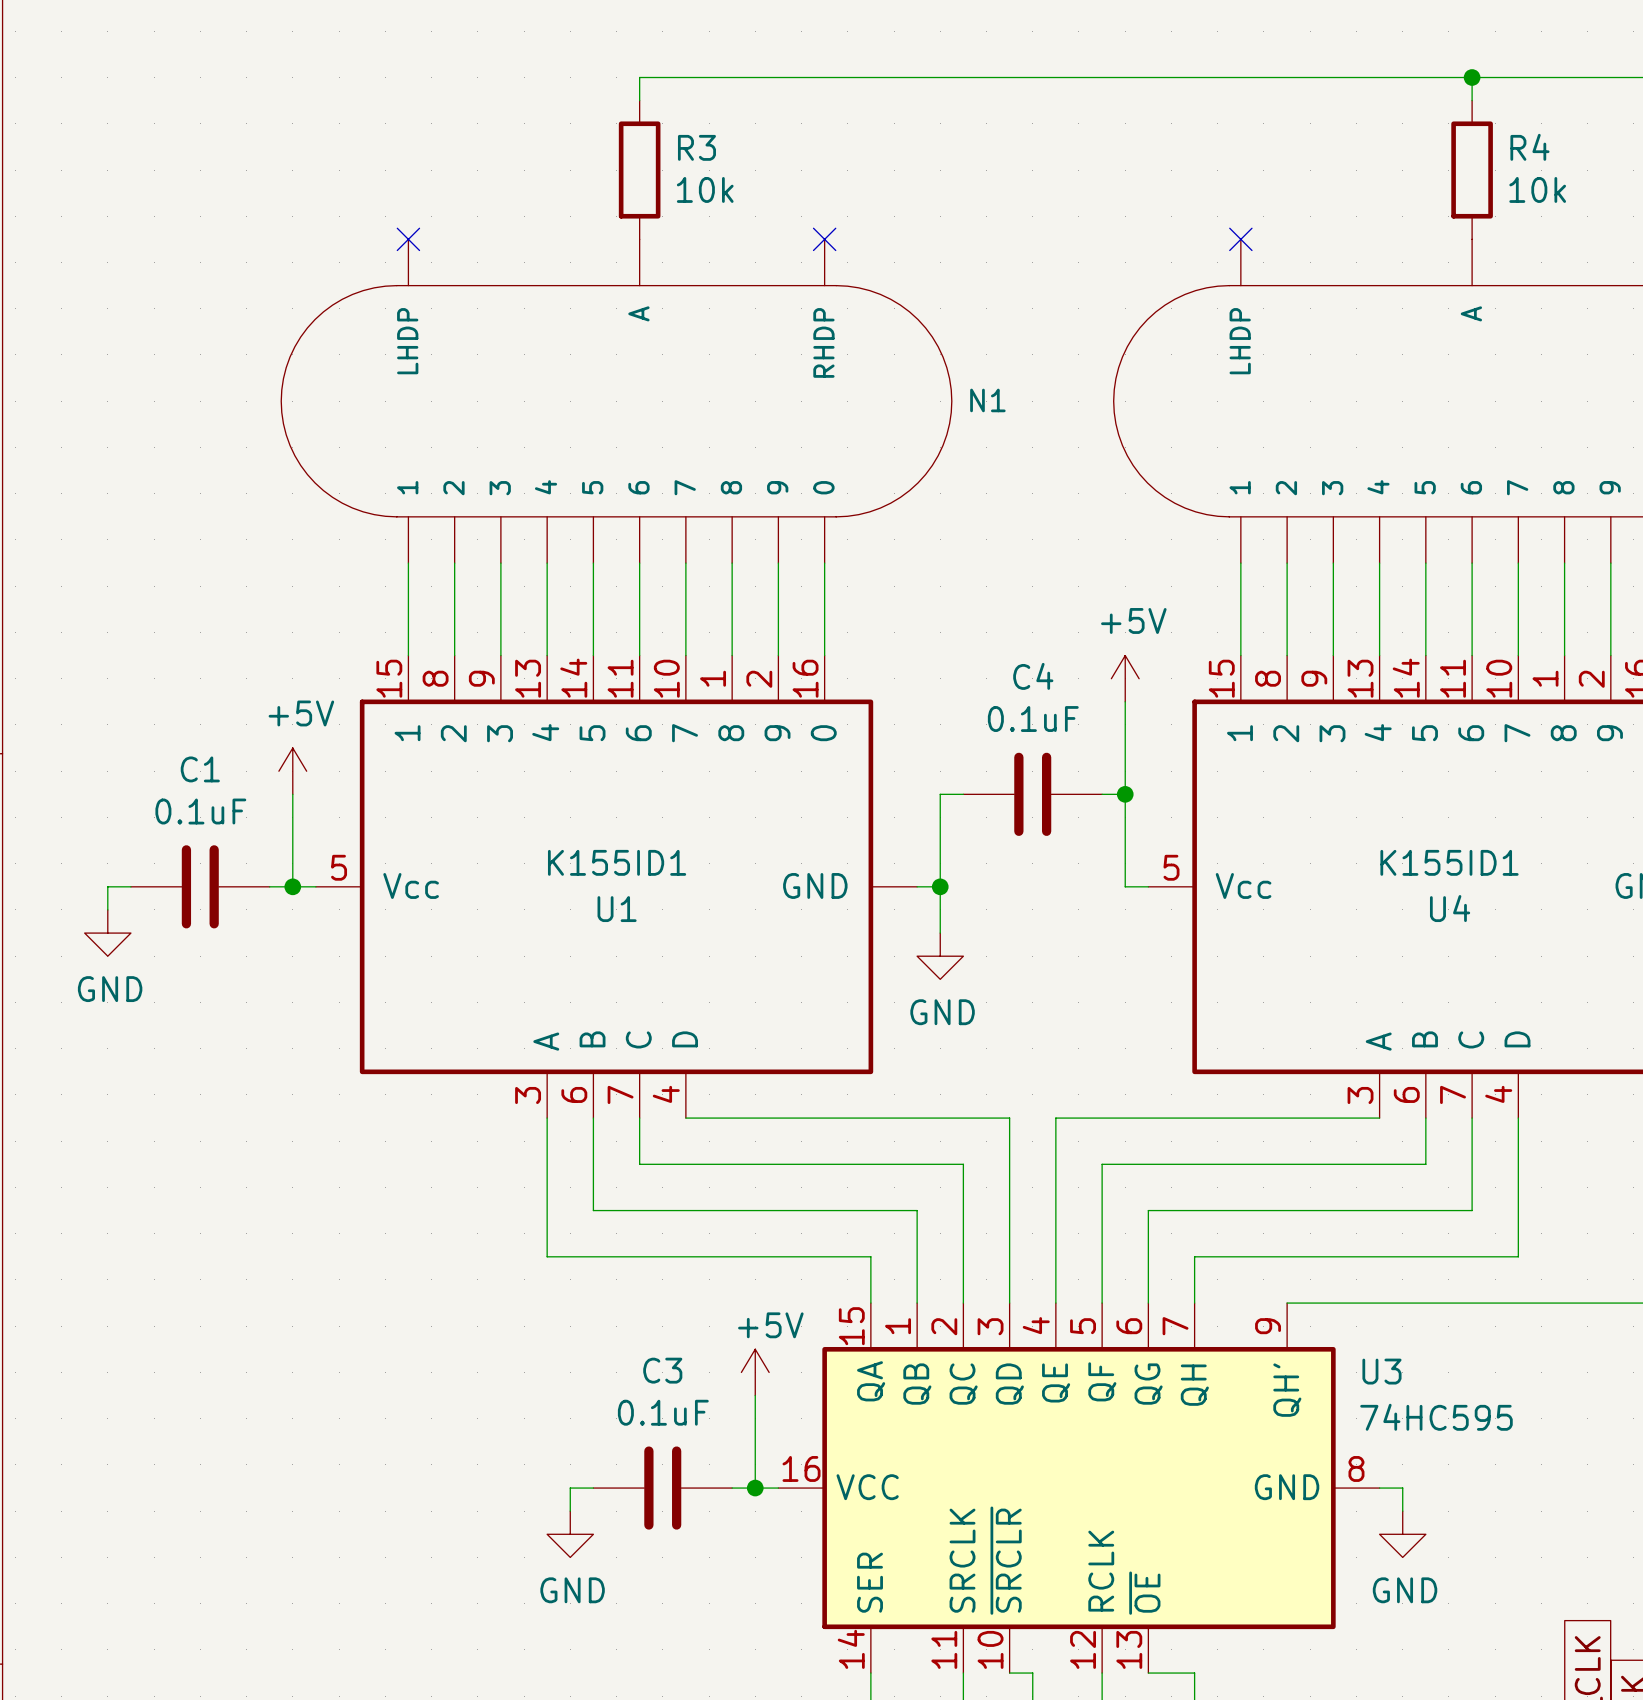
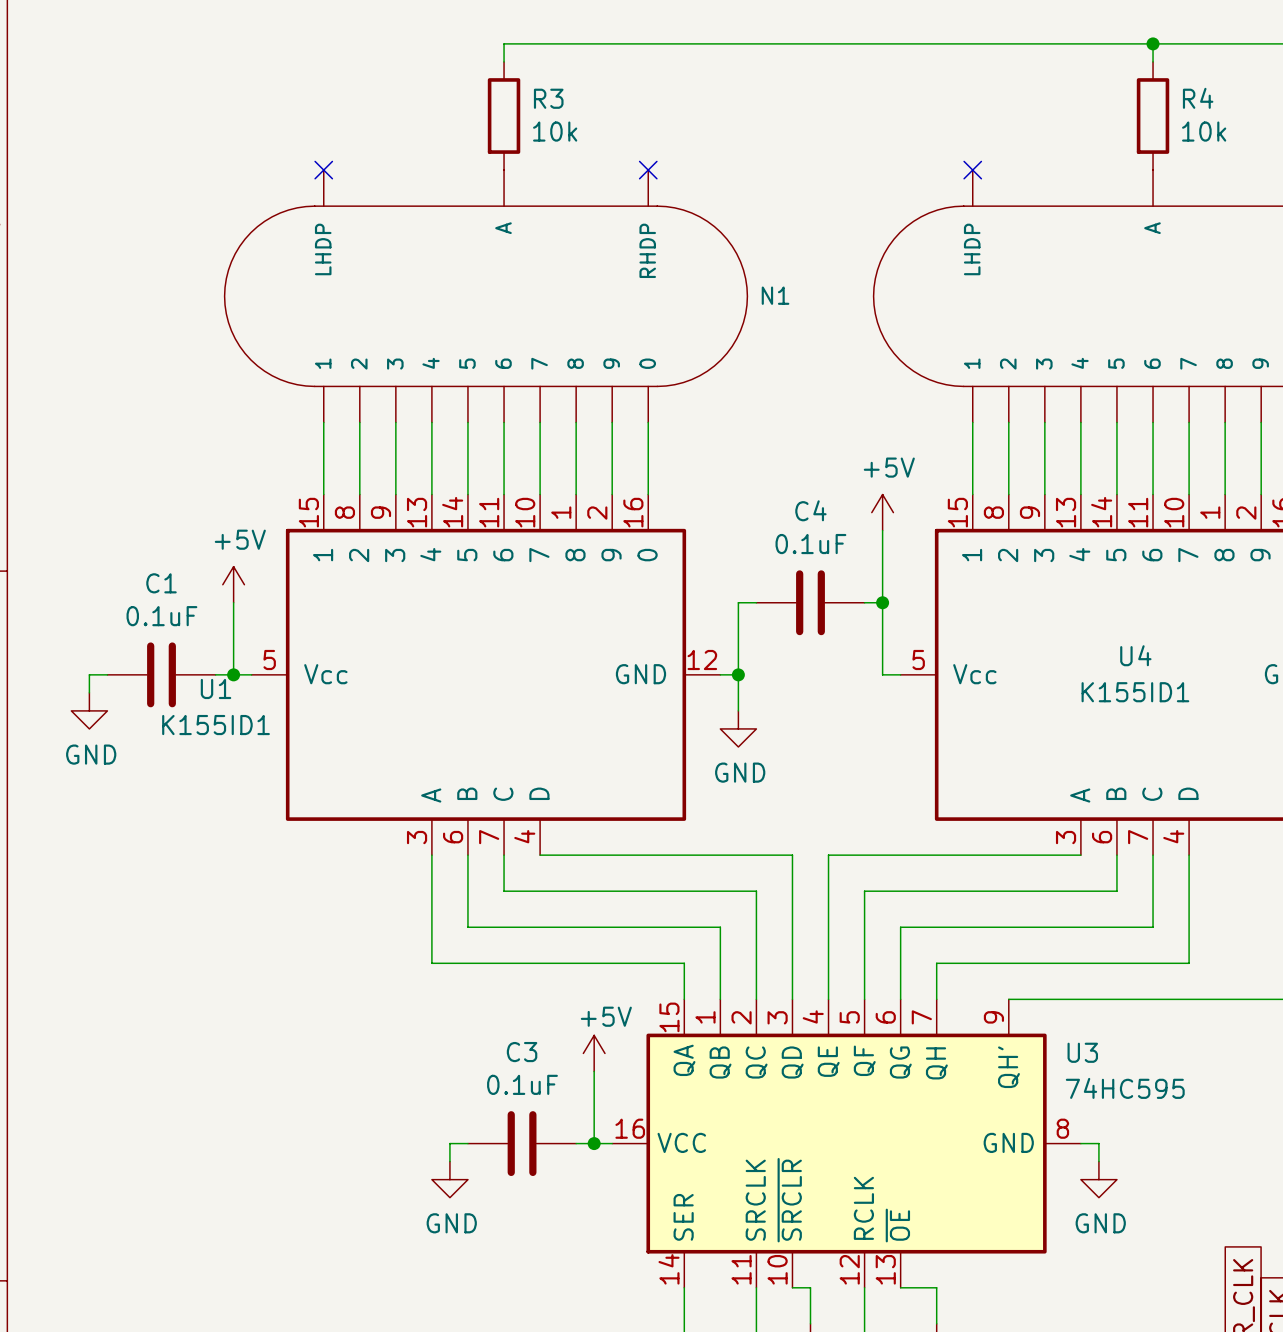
U1 value position: K155ID1 (617, 862) -> K155ID1 (216, 725)
U4 value position: K155ID1 (1449, 862) -> K155ID1 (1135, 692)
U1 pin number: none -> 12 (702, 659)
U4 name position: U4 (1450, 908) -> U4 (1135, 655)
U1 name position: U1 (617, 909) -> U1 (216, 688)

